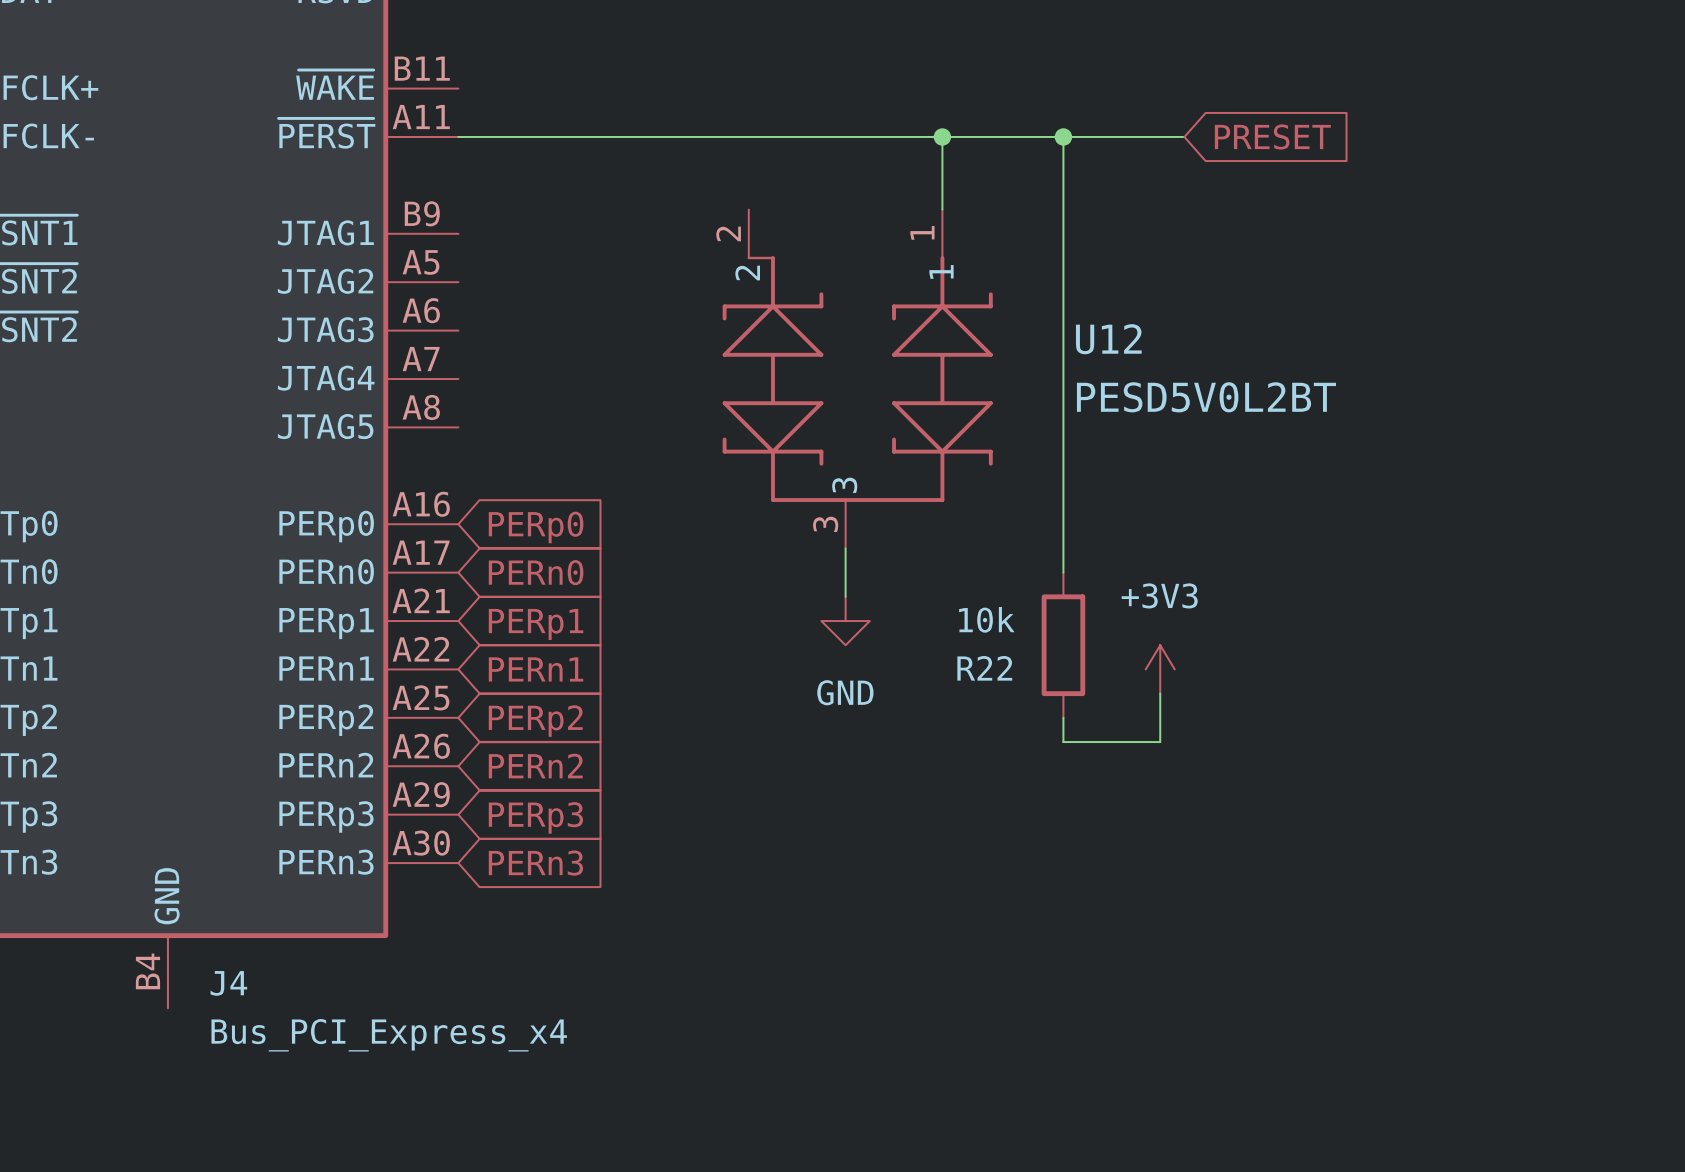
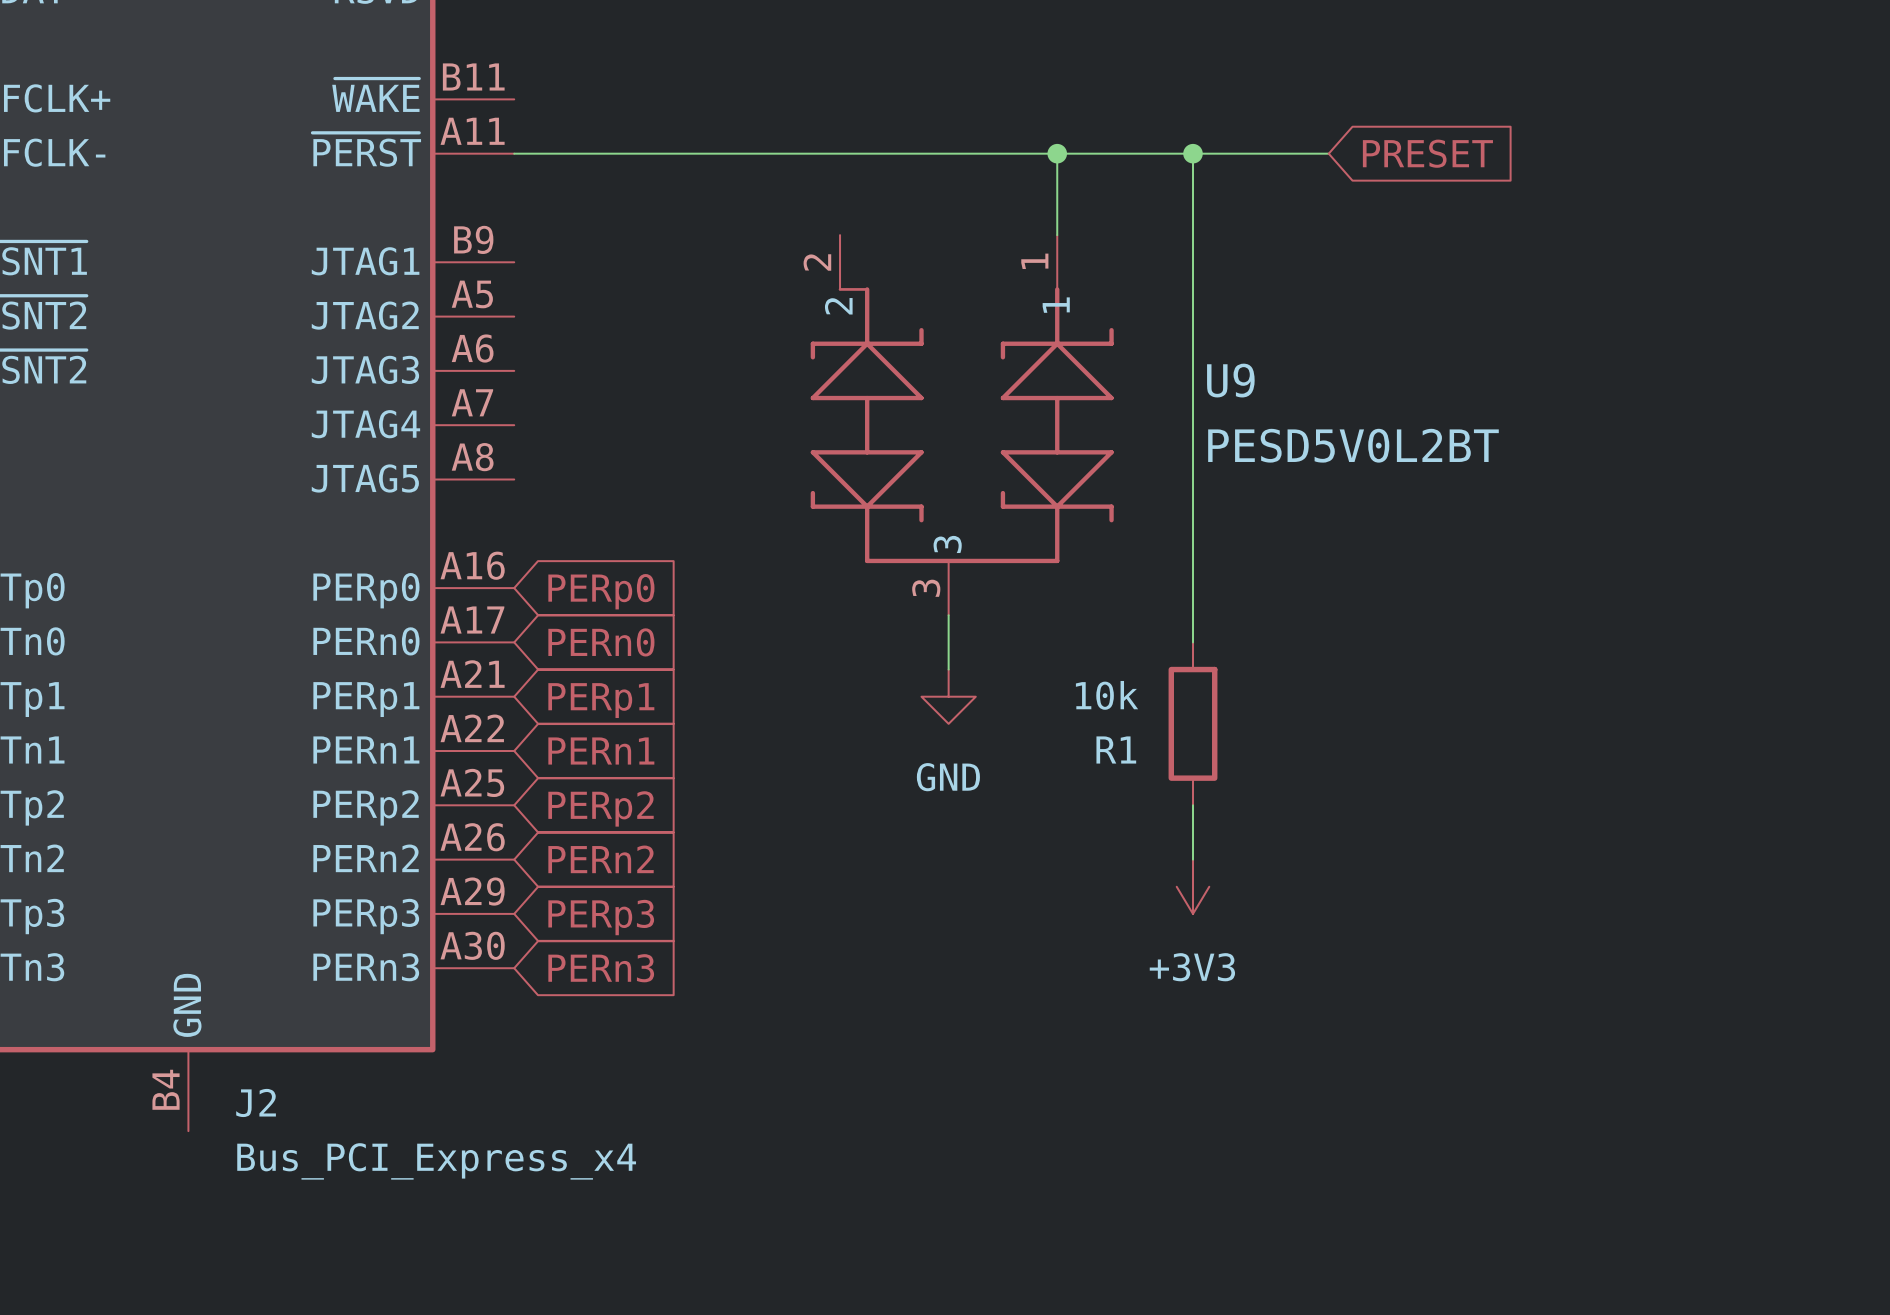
U12 name: U12 (1108, 339) -> U9 (1230, 380)
R22 name: R22 (984, 668) -> R1 (1116, 749)
power symbol rotation: 0° (1160, 669) -> 180° (1193, 886)
power symbol position: +3V3 (1160, 669) -> +3V3 (1193, 886)
wire: (1160, 693) (1160, 742) (1063, 742) -> (1193, 859) (1193, 832)
J4 name: J4 (228, 983) -> J2 (256, 1102)

